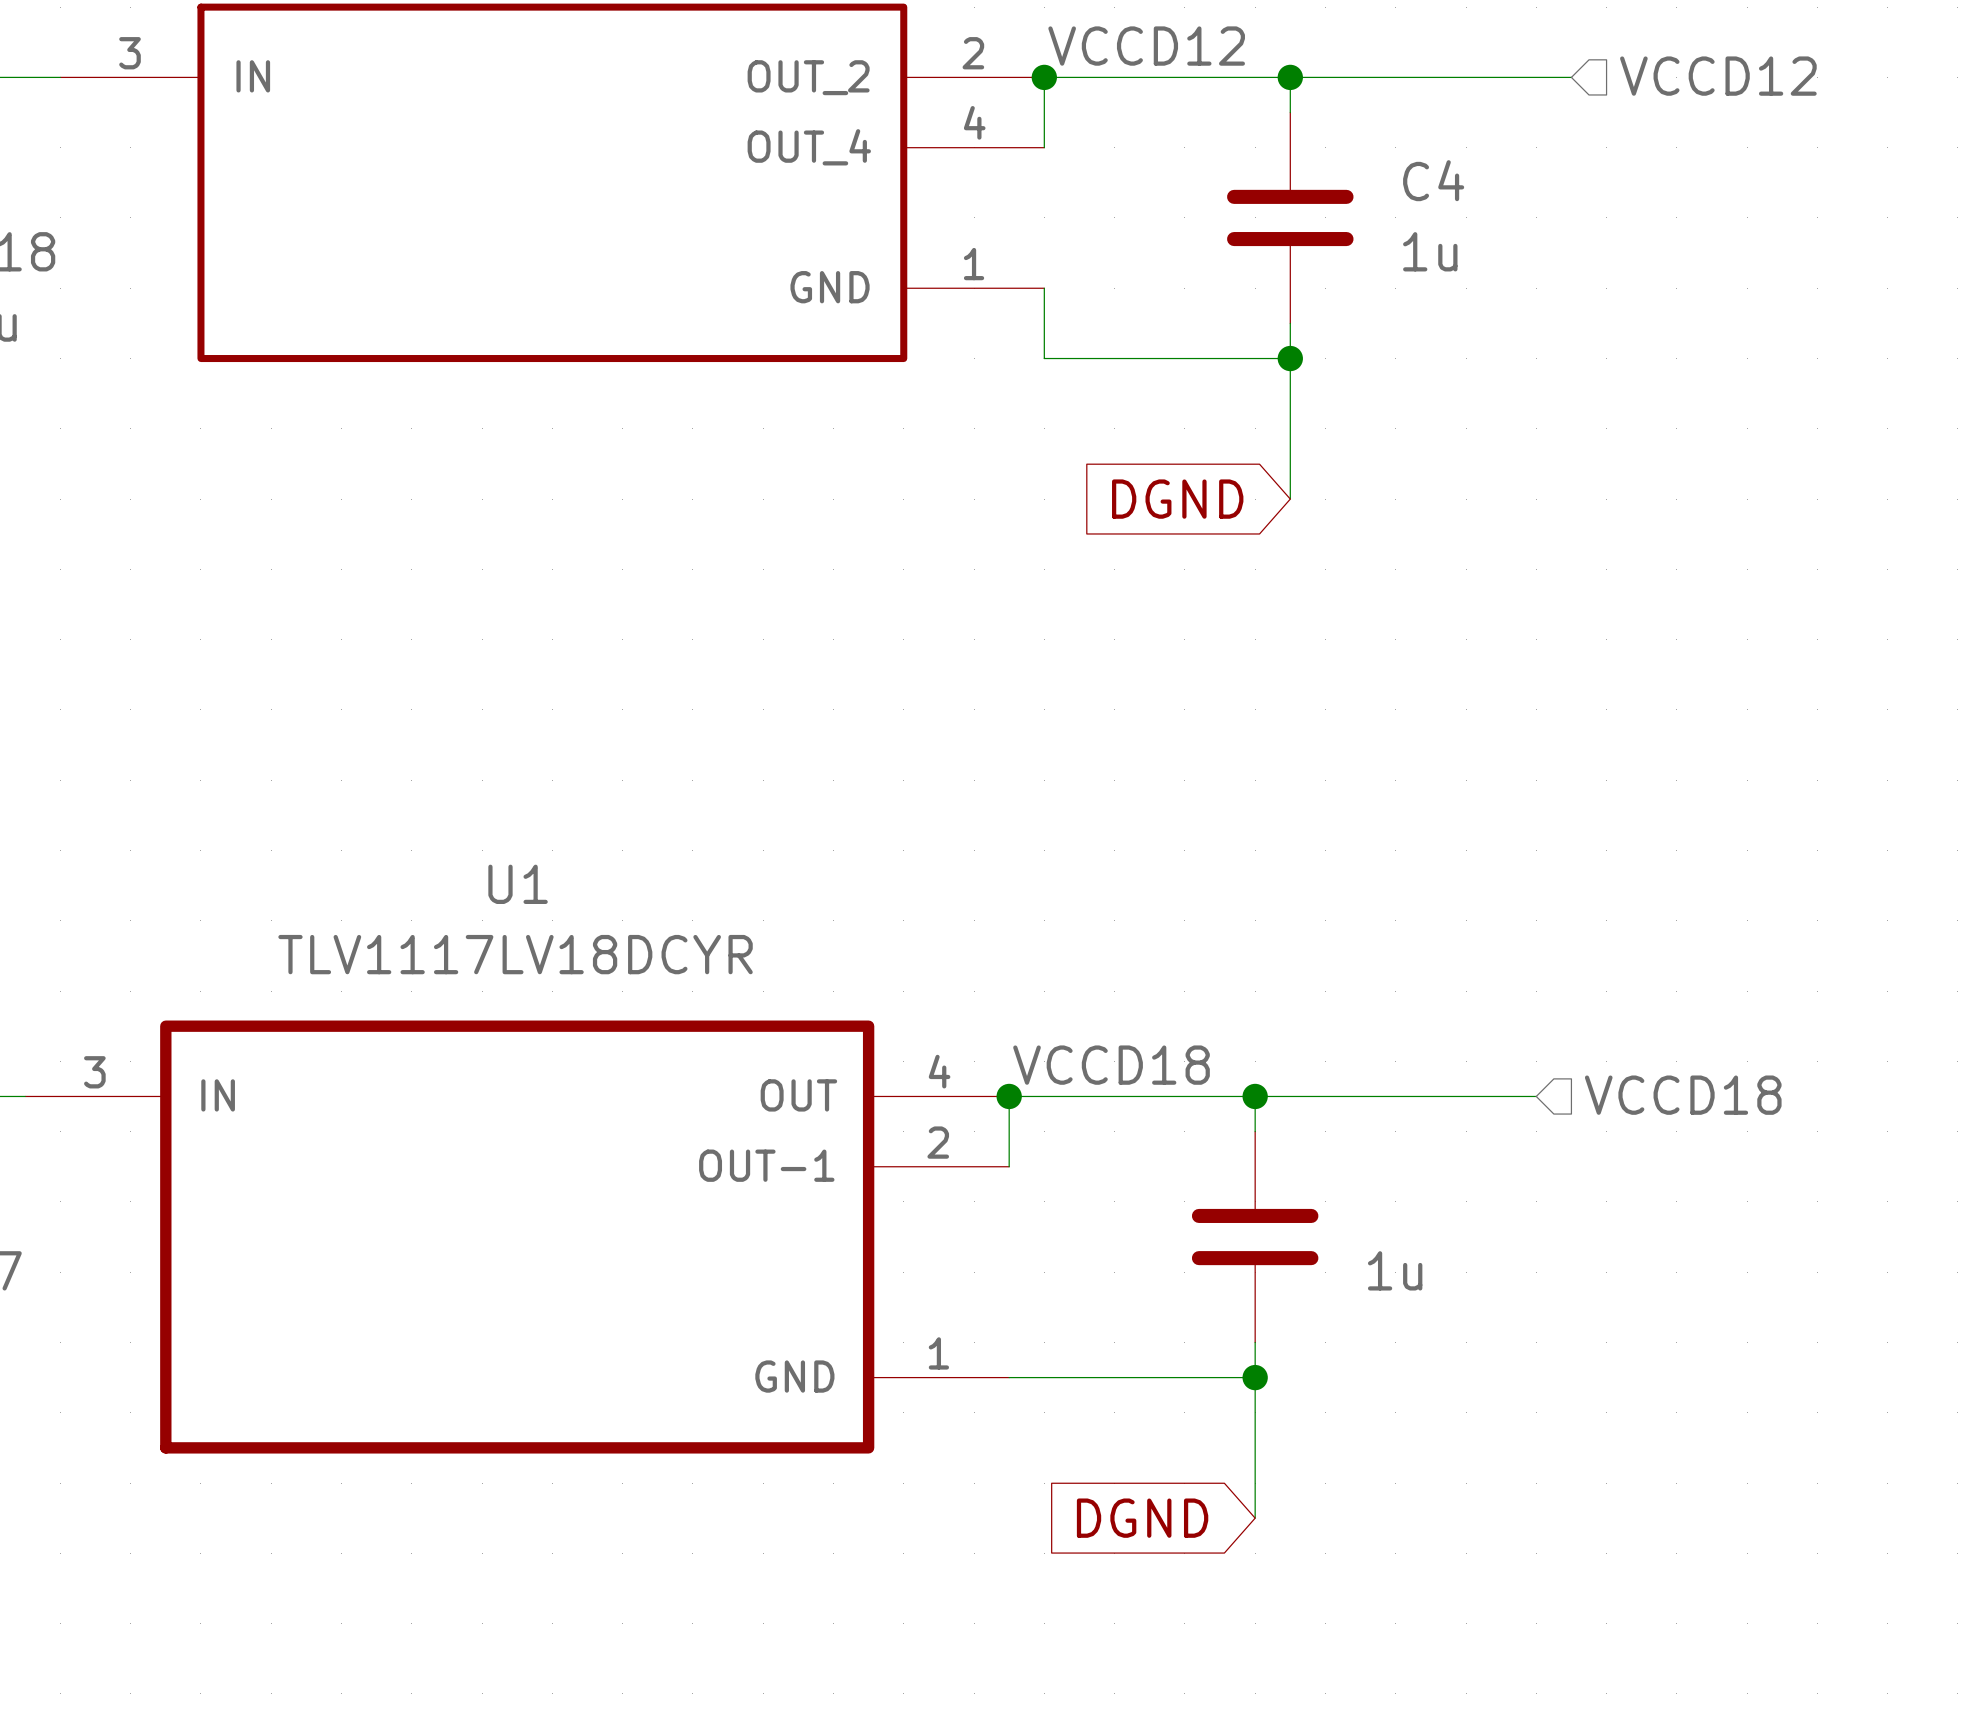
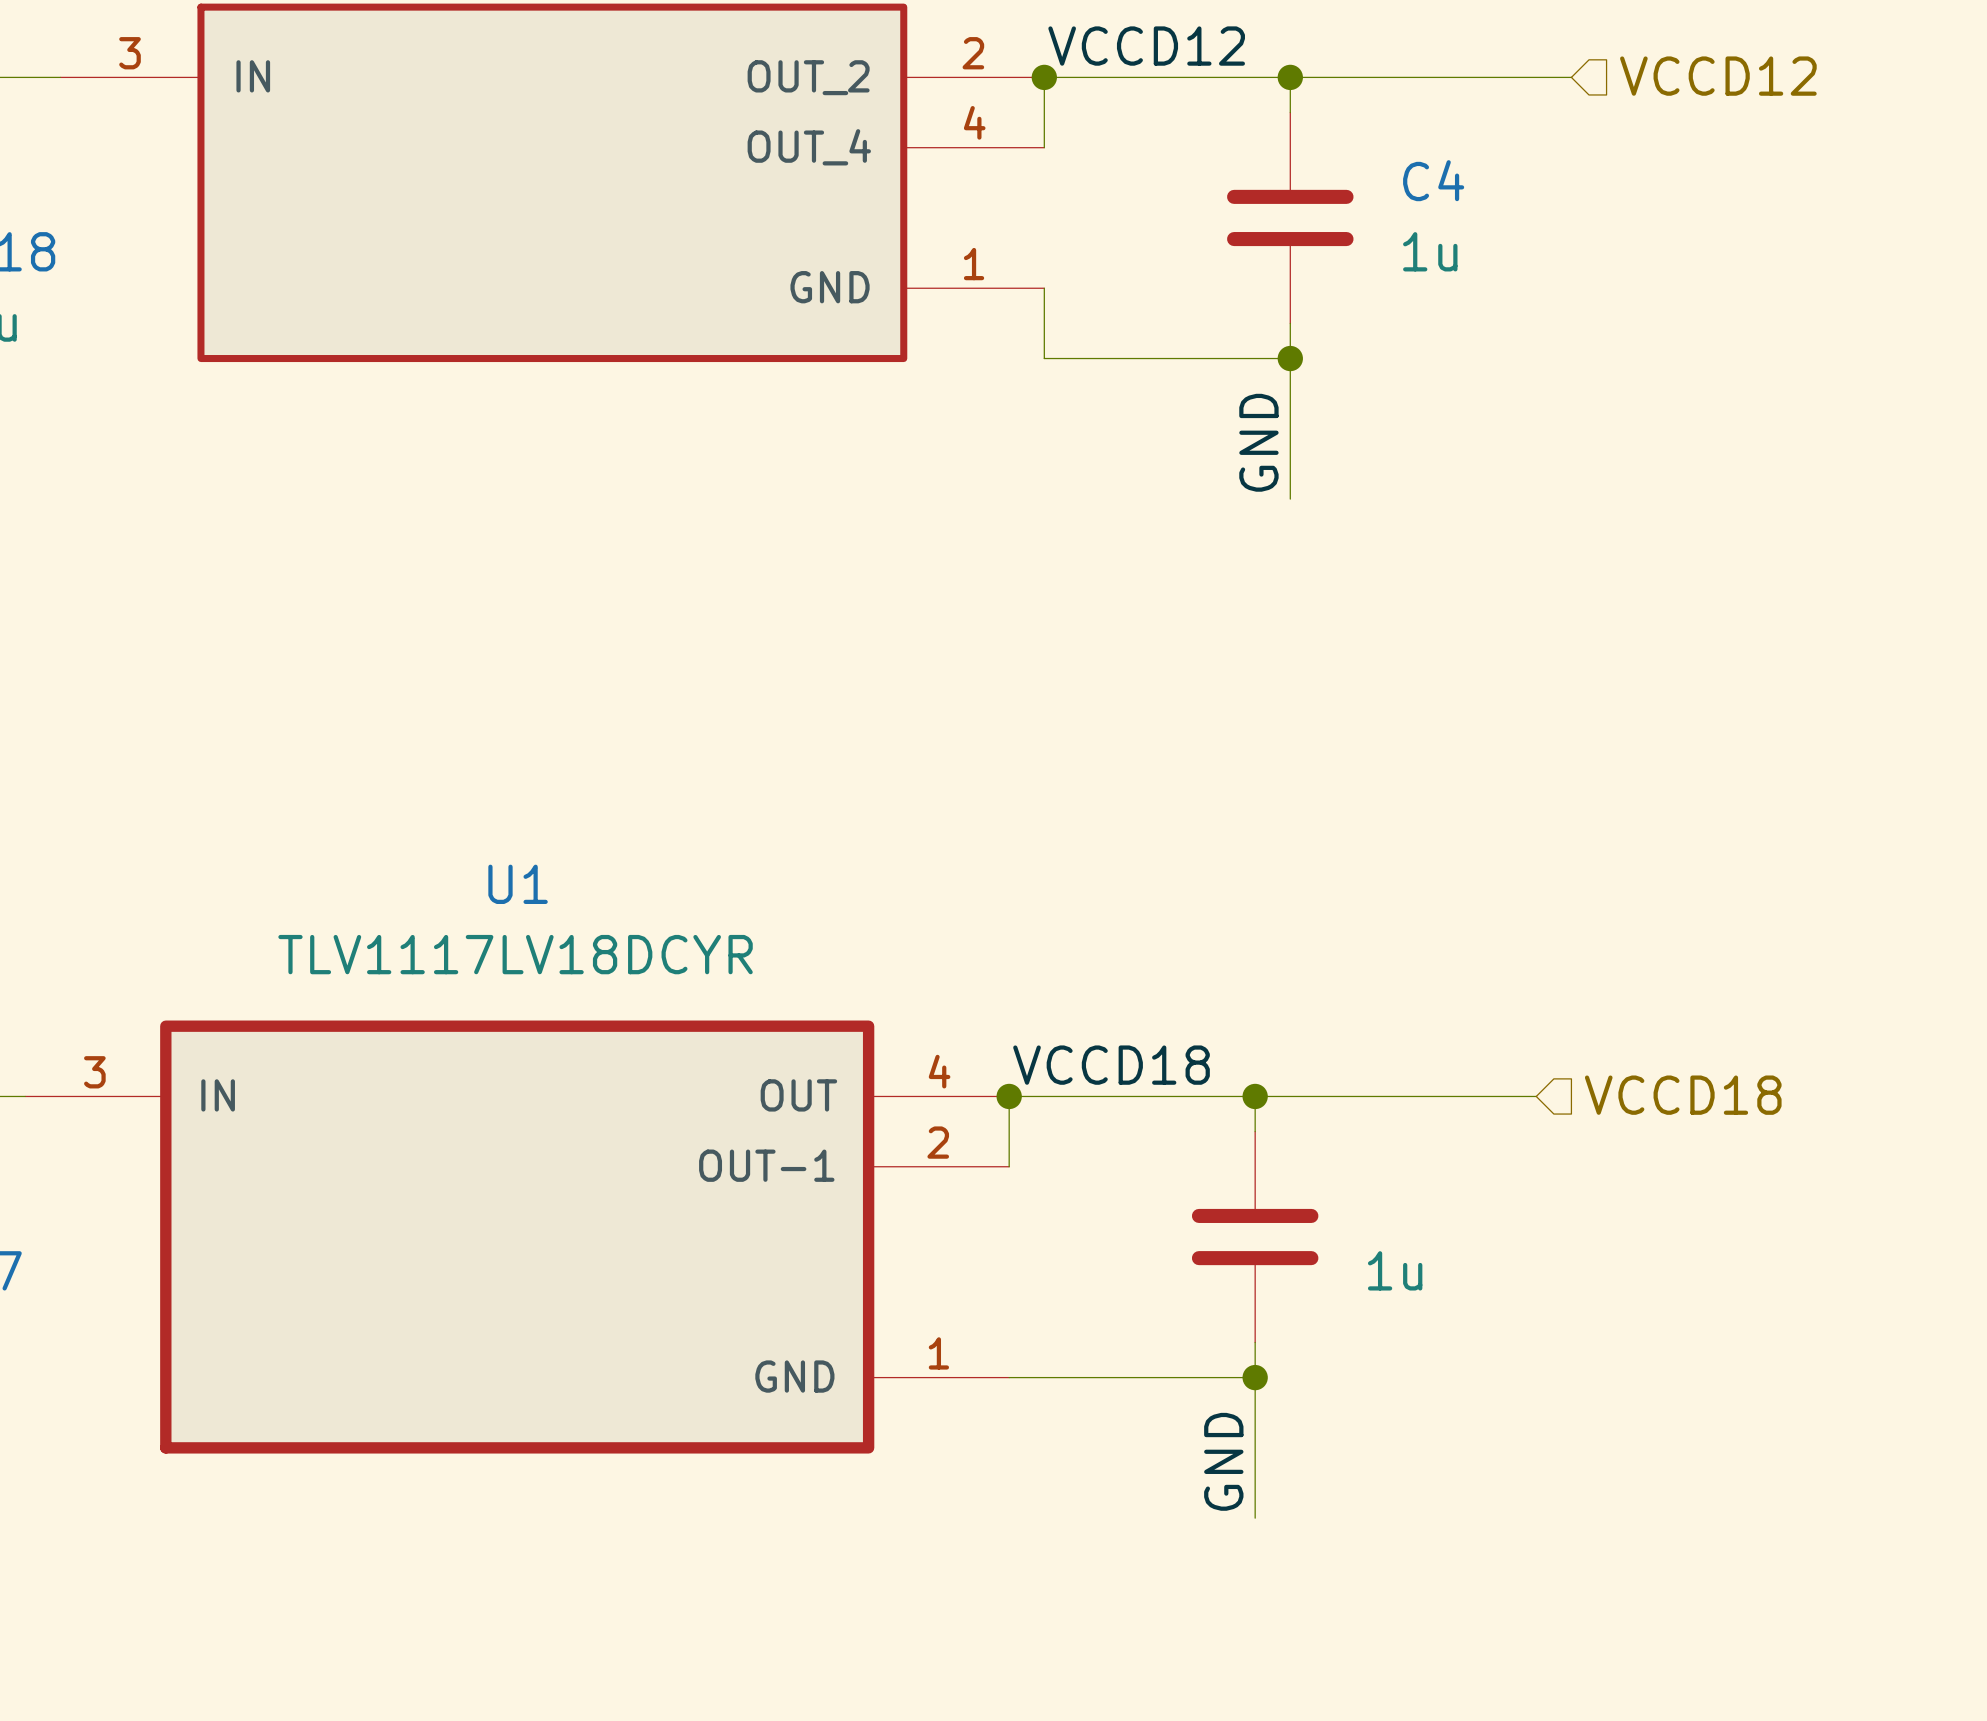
label: none -> GND (1258, 442)
global label: DGND (1177, 499) -> none
label: none -> GND (1223, 1461)
global label: DGND (1142, 1518) -> none

